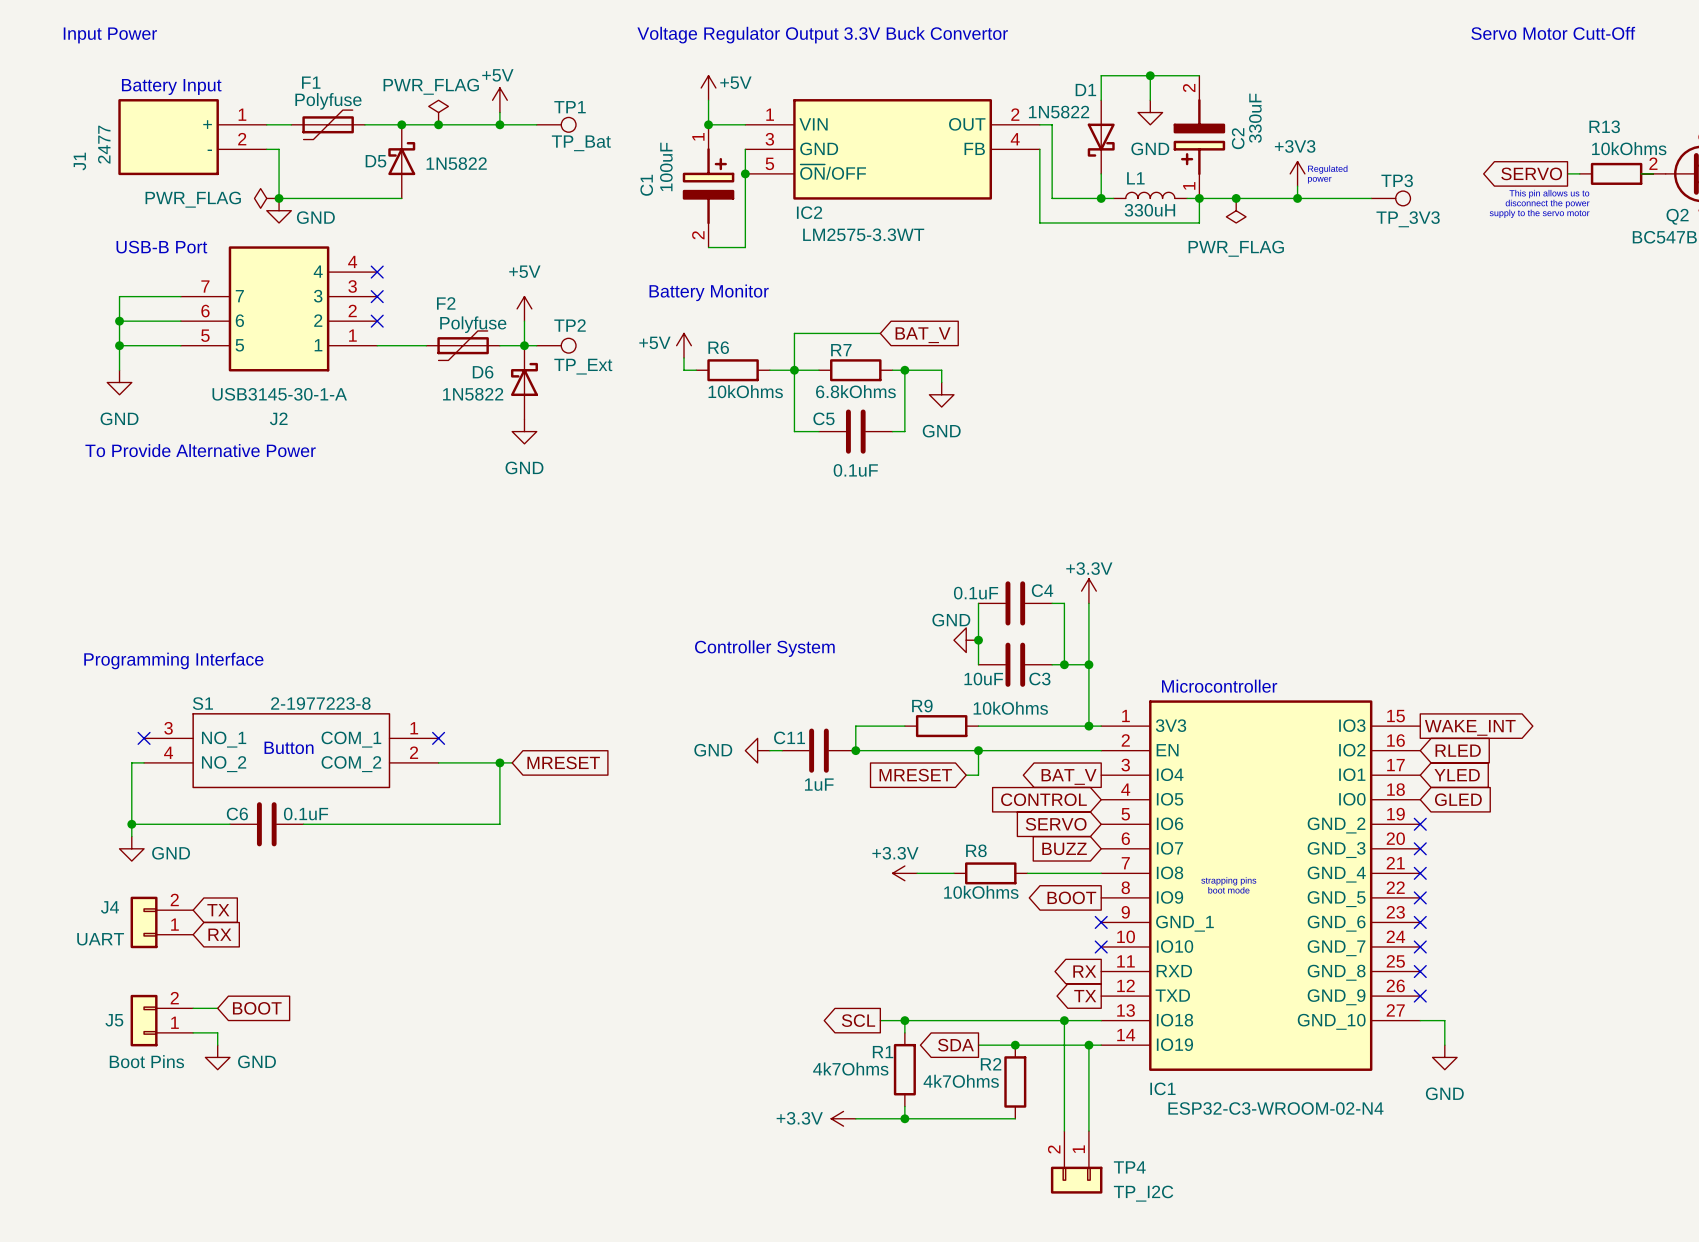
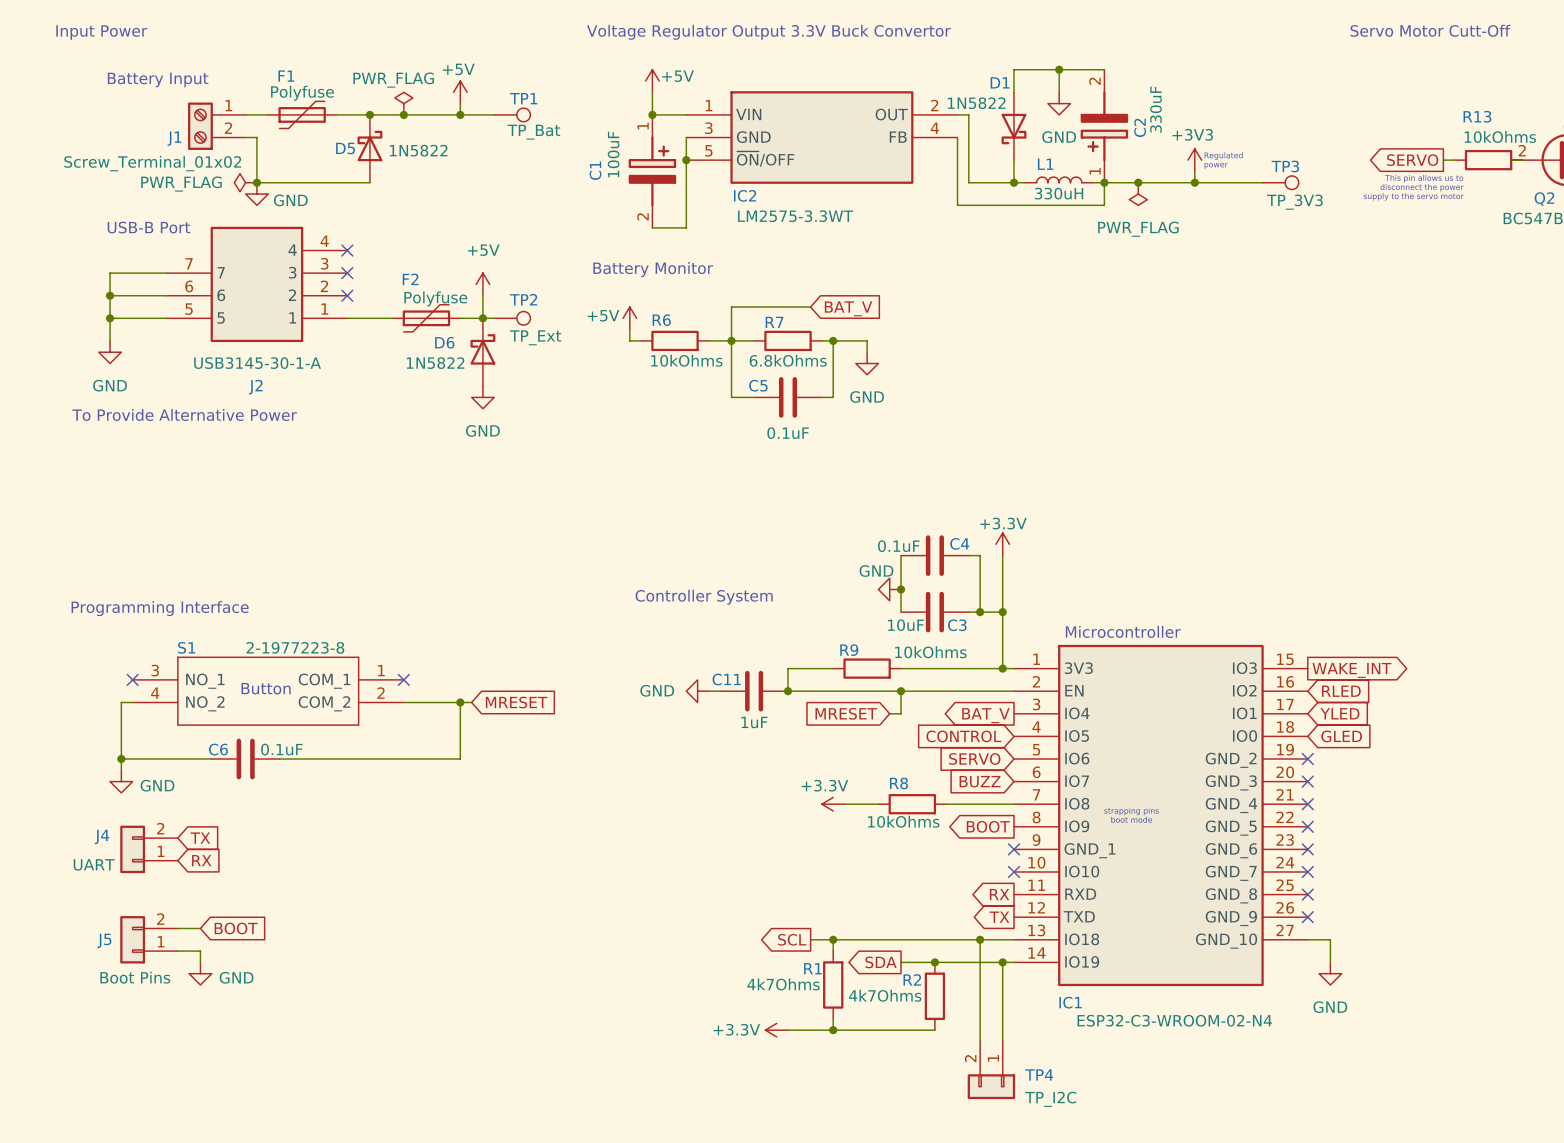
J1 symbol: [118, 99, 267, 176] -> [188, 102, 246, 150]
J1 value: 2477 (104, 144) -> Screw_Terminal_01x02 (152, 163)
J1 name position: J1 (79, 161) -> J1 (174, 138)

